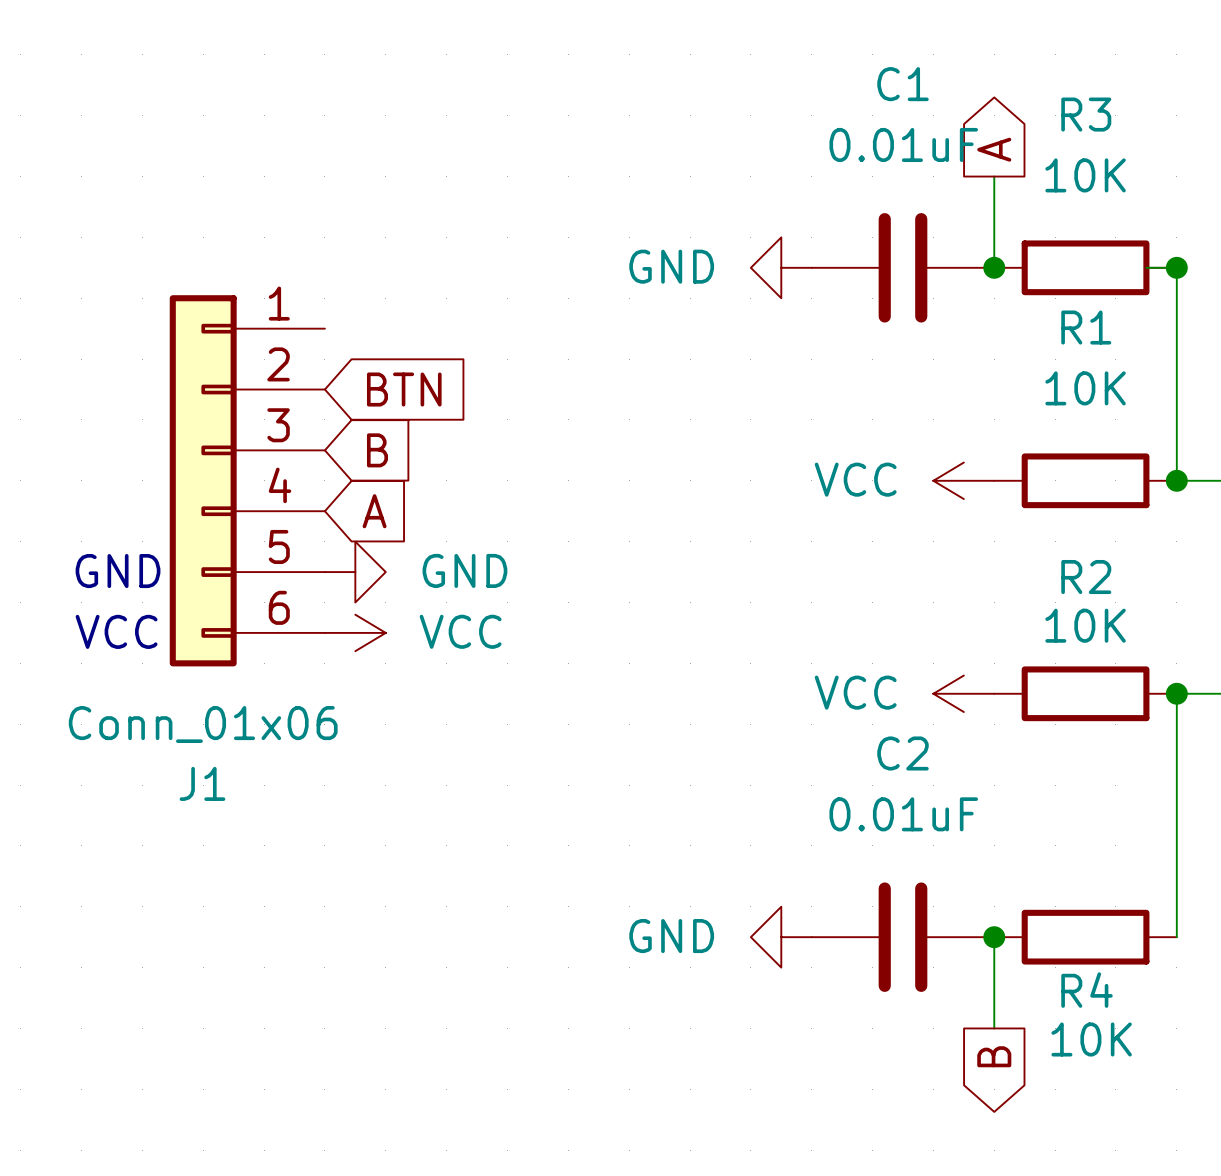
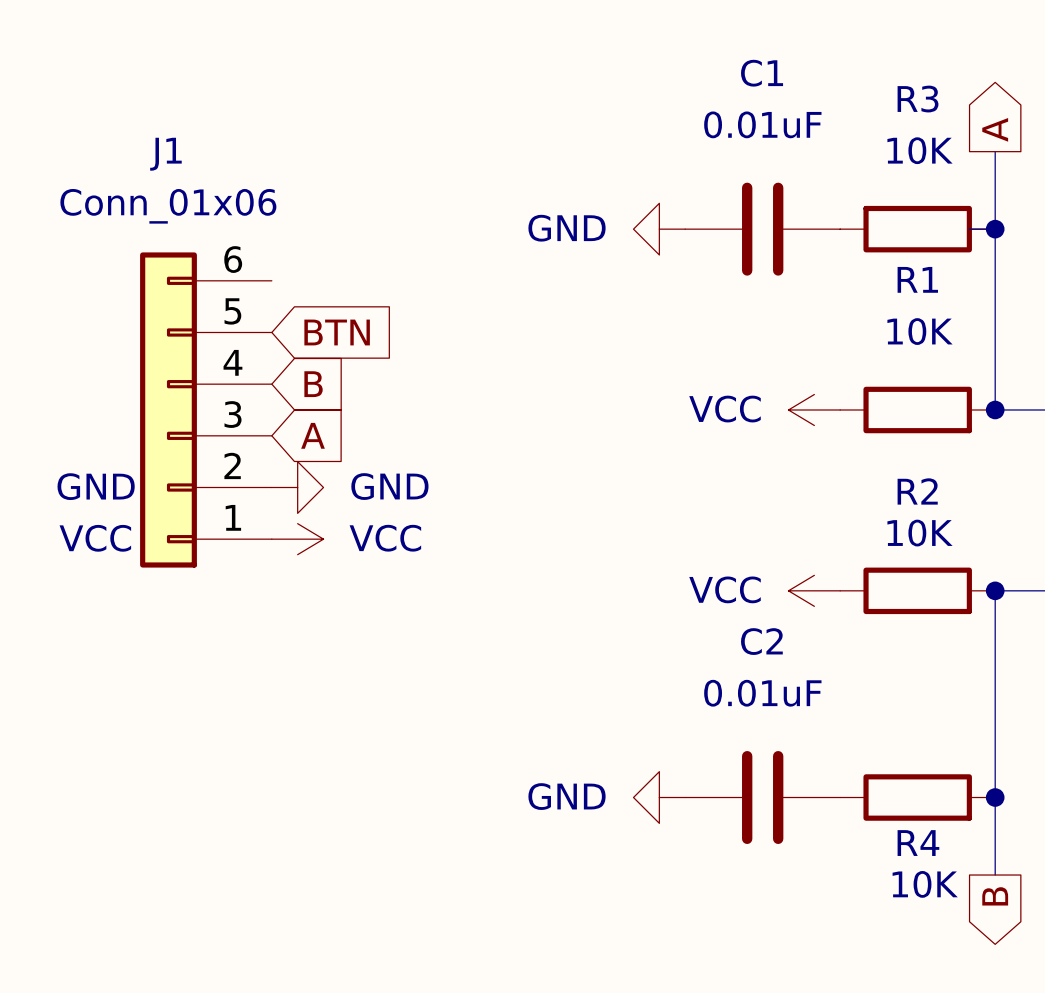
global label position: A (994, 149) -> A (995, 129)
wire: (994, 176) (994, 267) -> (995, 151) (995, 229)
junction: (994, 267) -> none
J1 flip: as is (203, 480) -> up-down (168, 409)
wire: (994, 937) (994, 1028) -> (995, 797) (995, 875)
junction: (994, 937) -> none
junction: none -> (995, 797)
global label position: B (994, 1056) -> B (995, 896)

